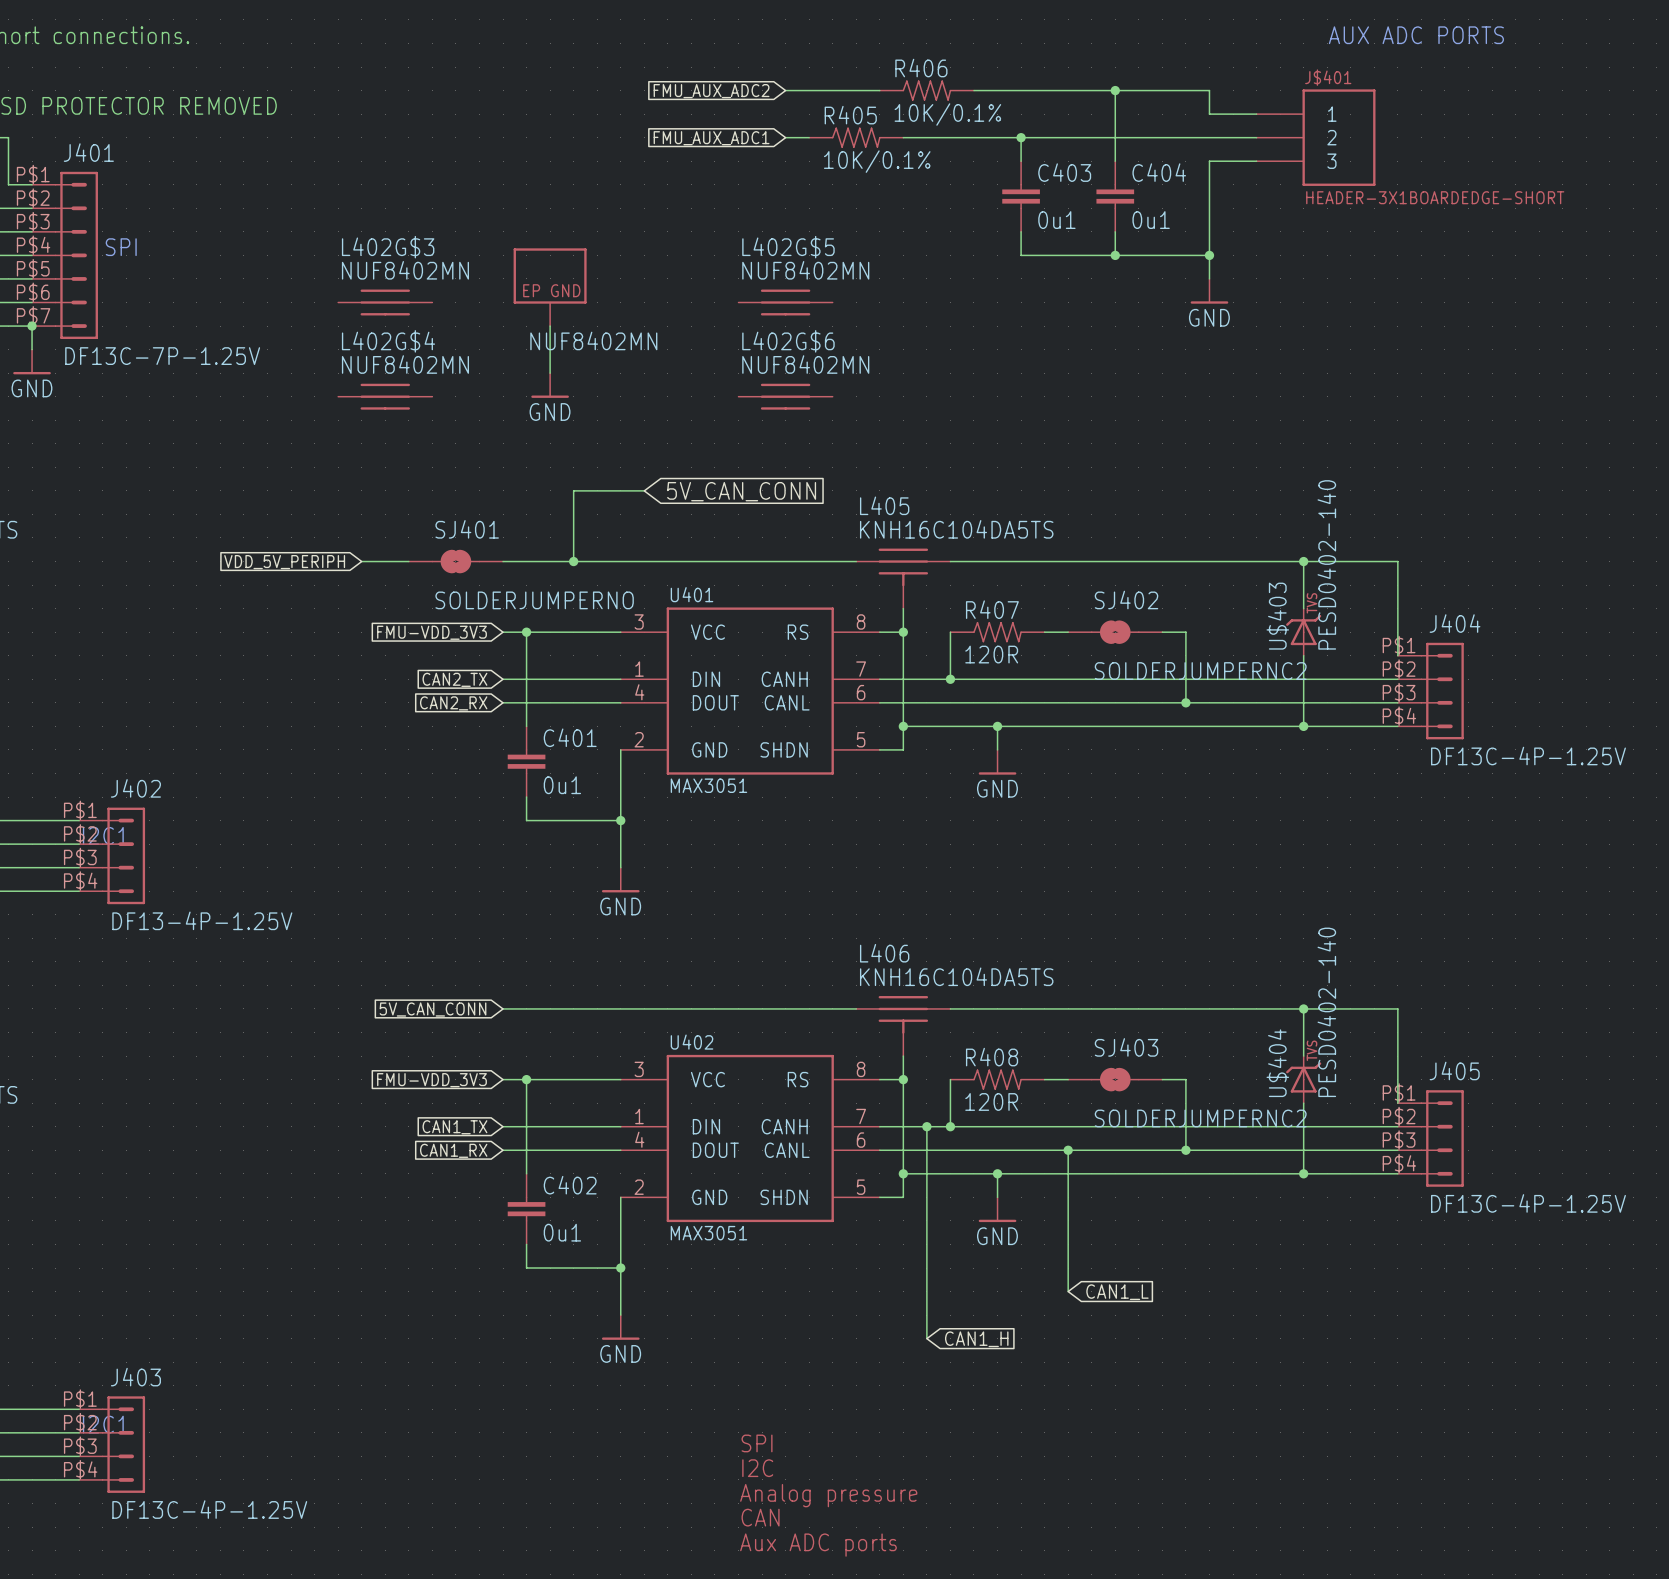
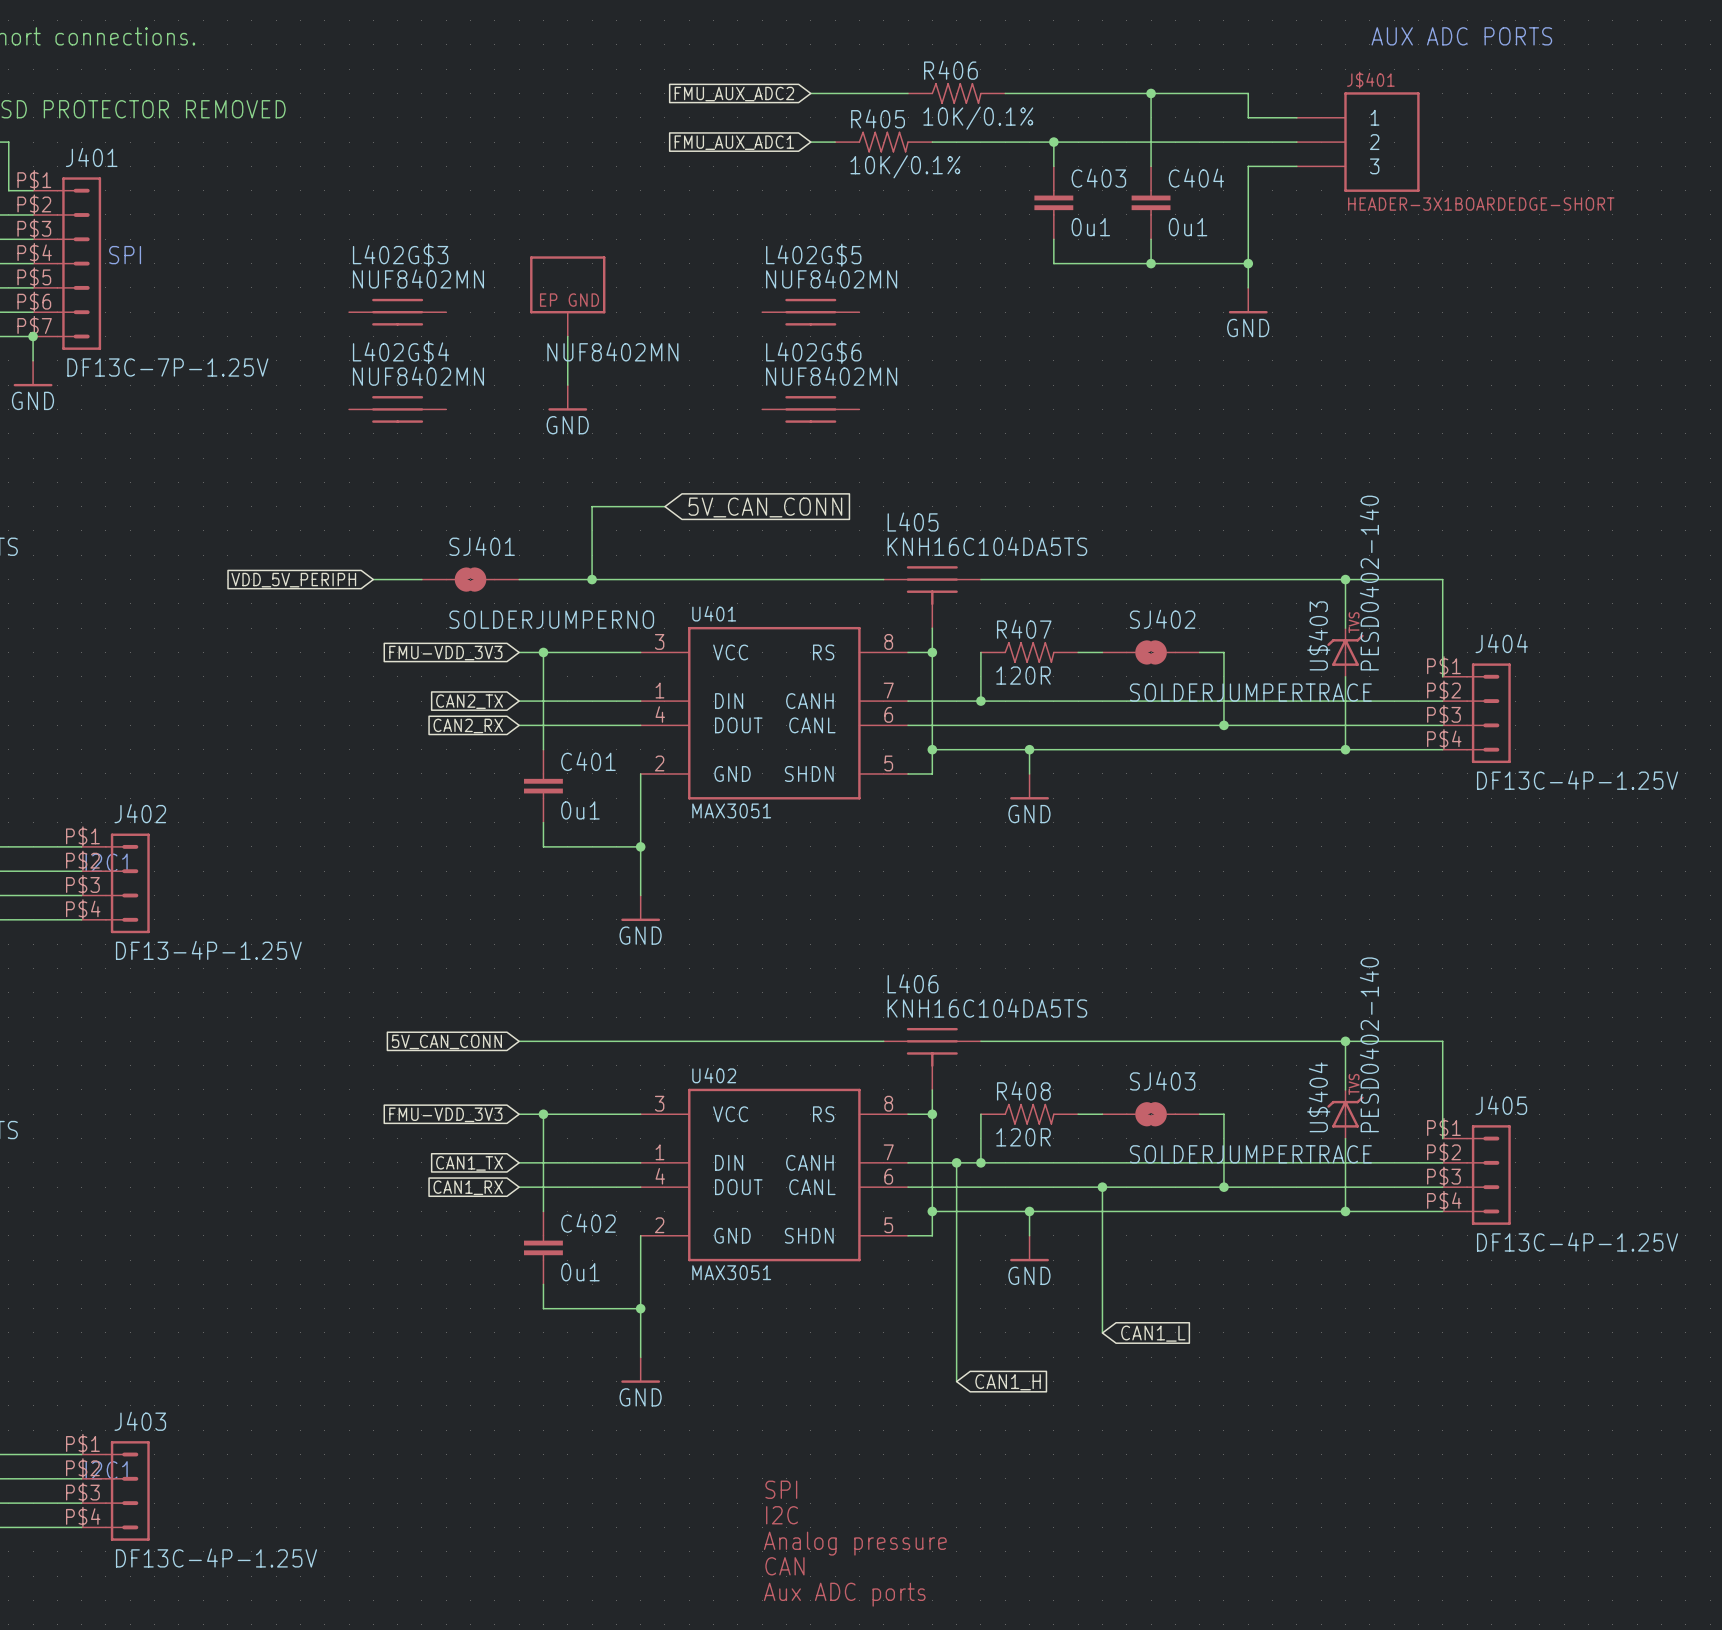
SJ402 value: SOLDERJUMPERNC2 (1200, 671) -> SOLDERJUMPERTRACE (1250, 692)
SJ403 value: SOLDERJUMPERNC2 (1200, 1118) -> SOLDERJUMPERTRACE (1250, 1154)

